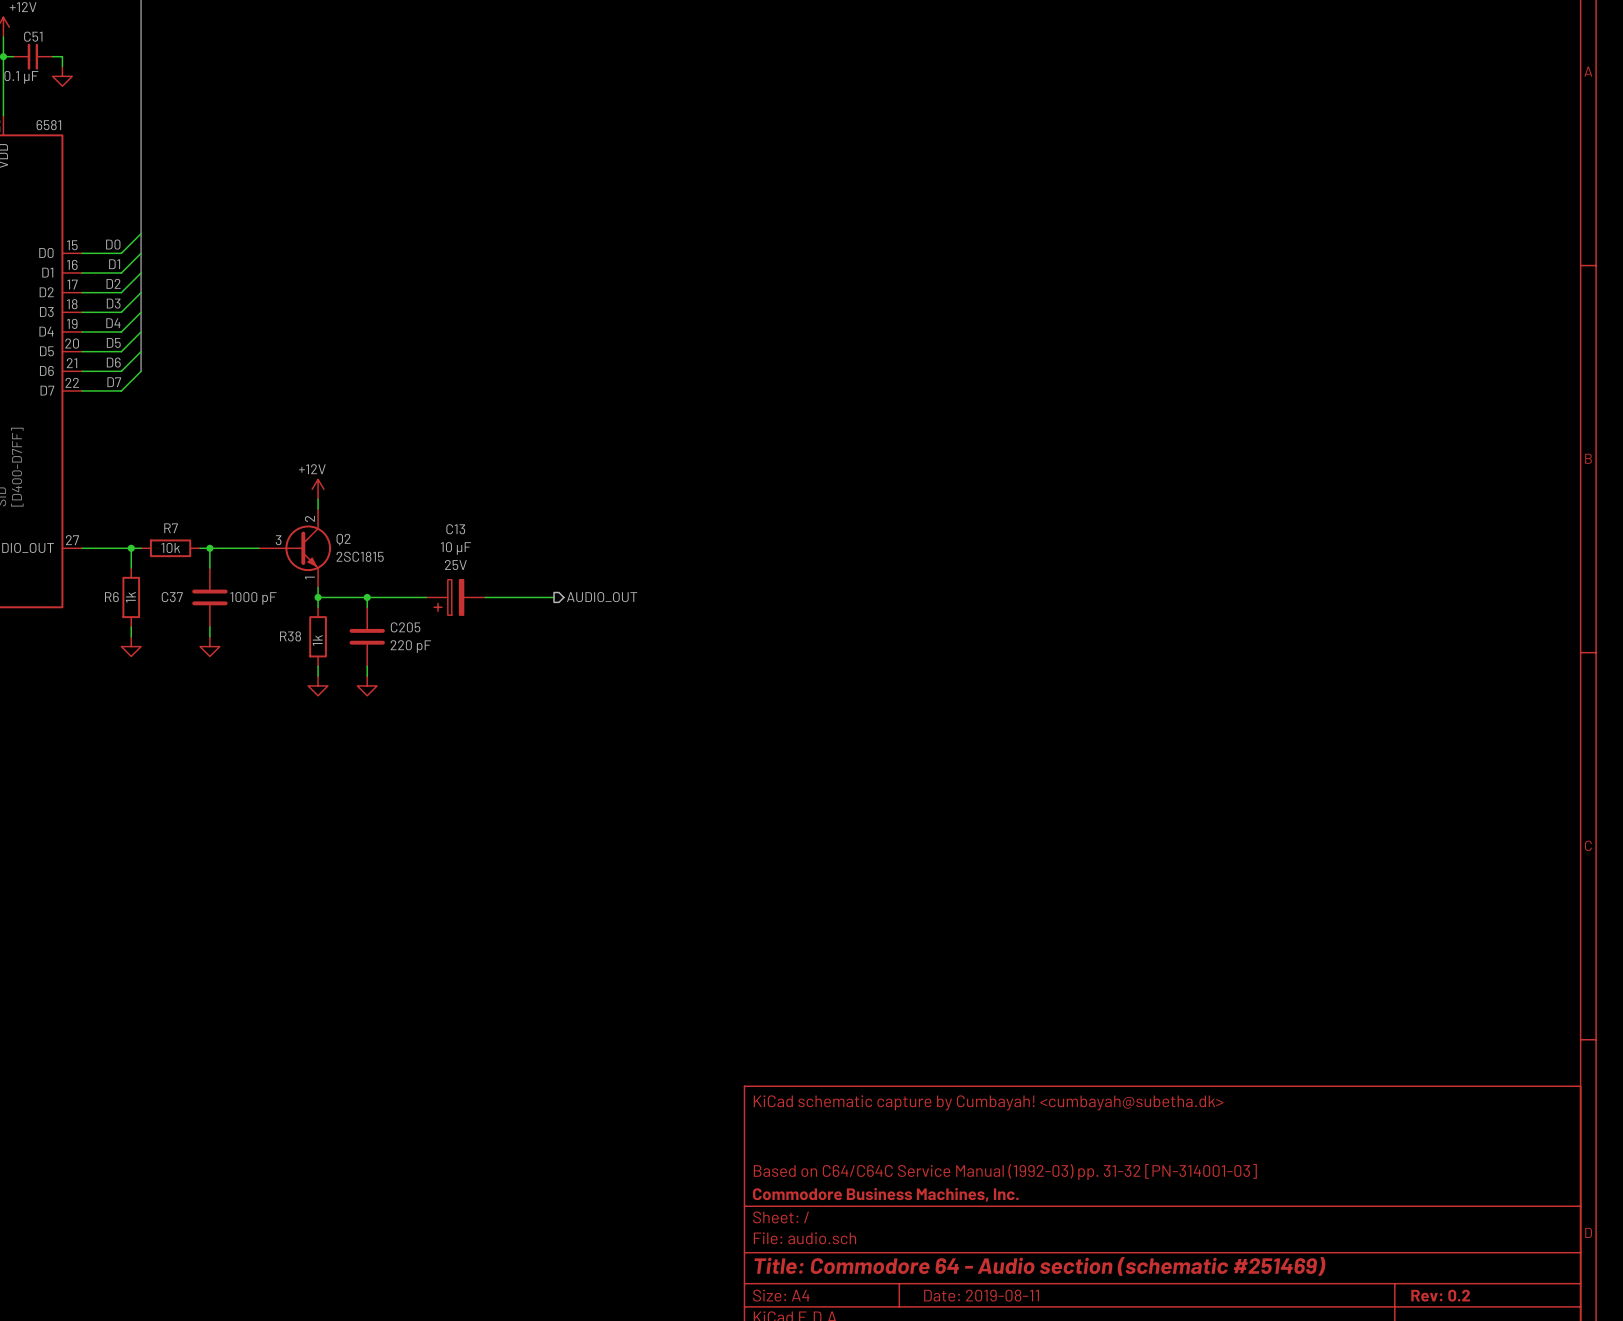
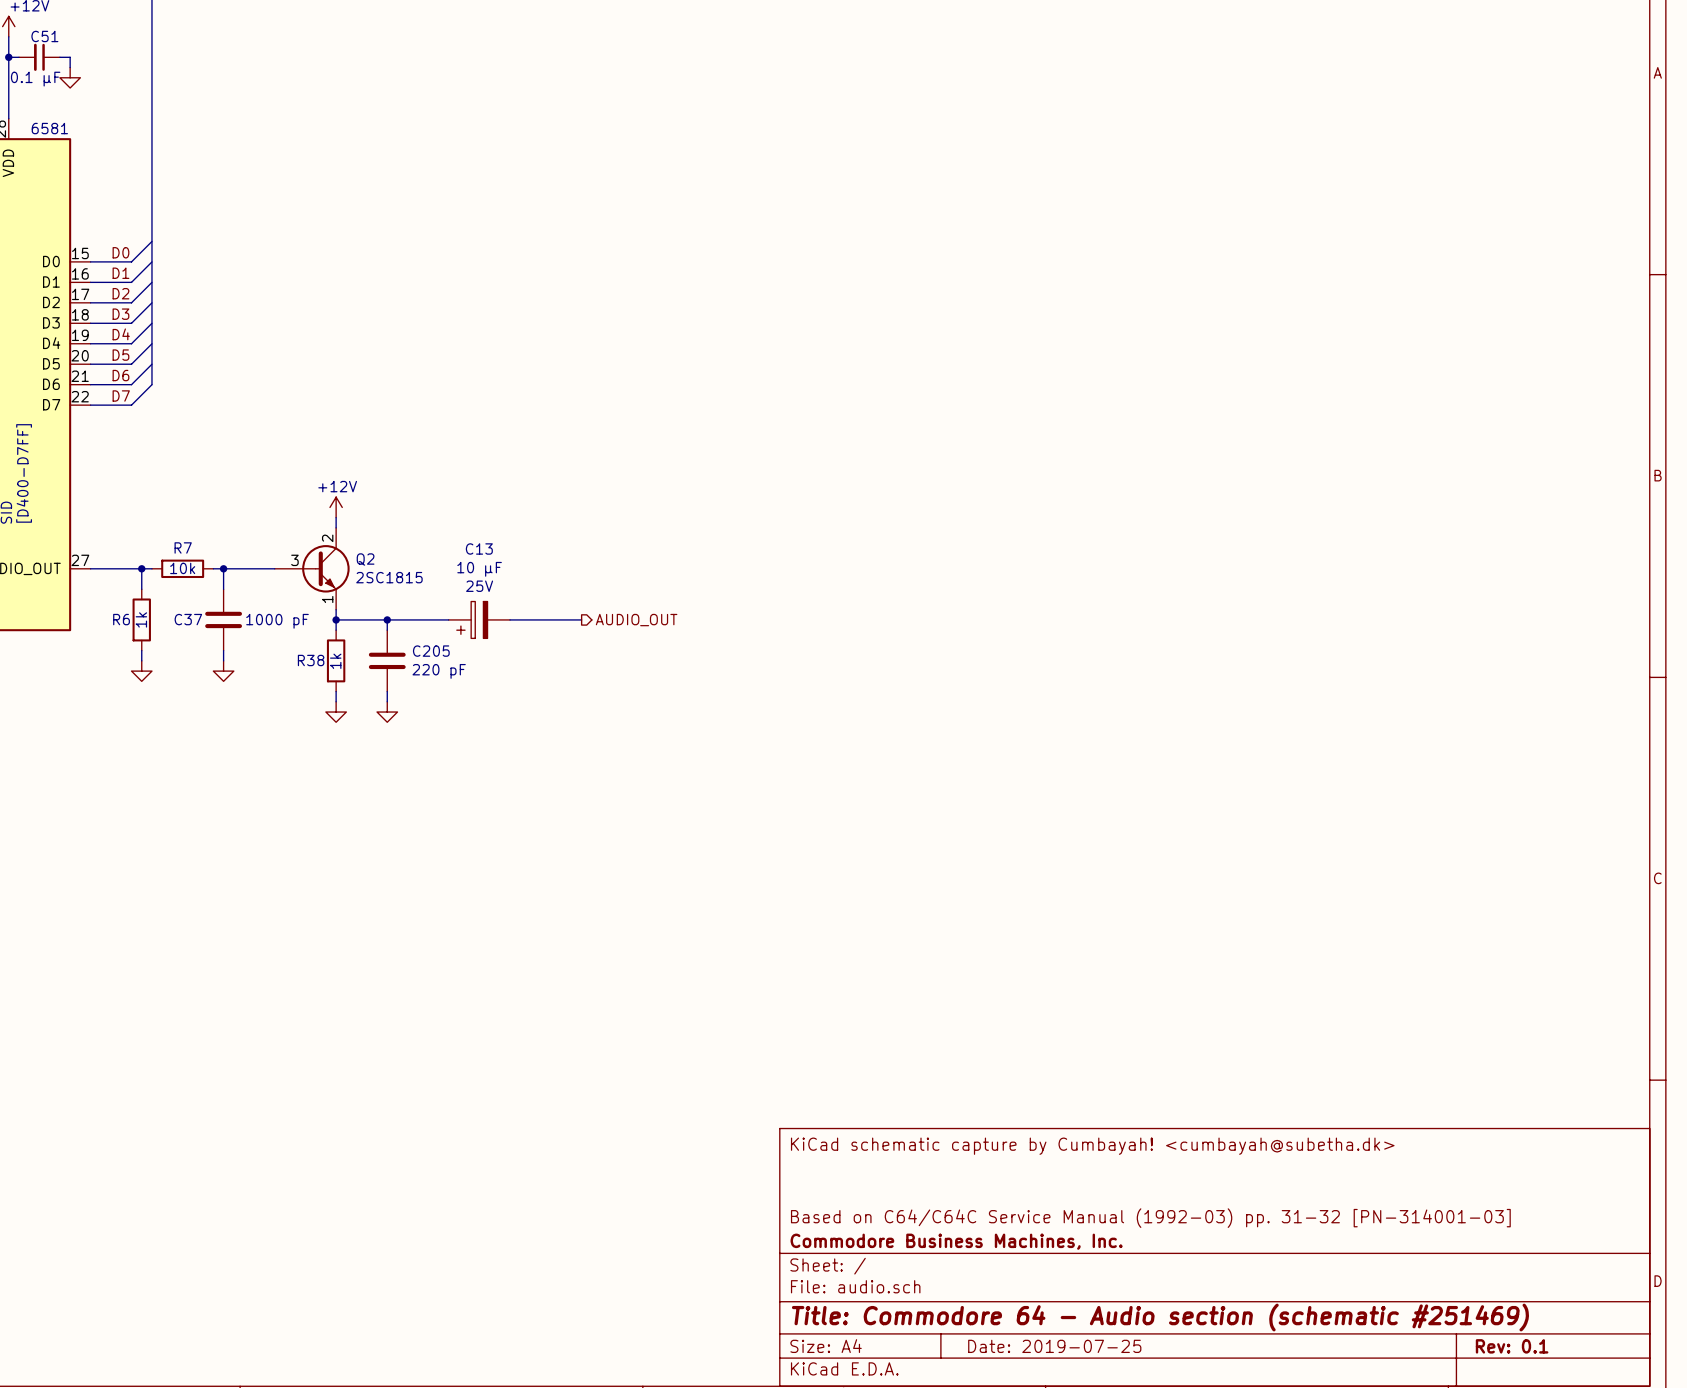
title block: Date: 2019-08-11 (981, 1295) -> Date: 2019-07-25 (1054, 1346)
title block: Rev: 0.2 (1440, 1295) -> Rev: 0.1 (1512, 1346)

